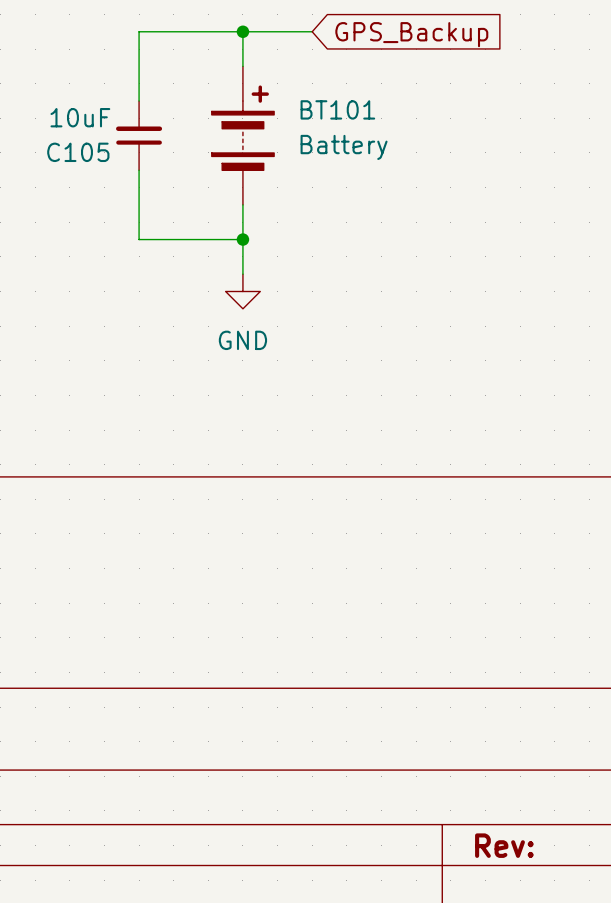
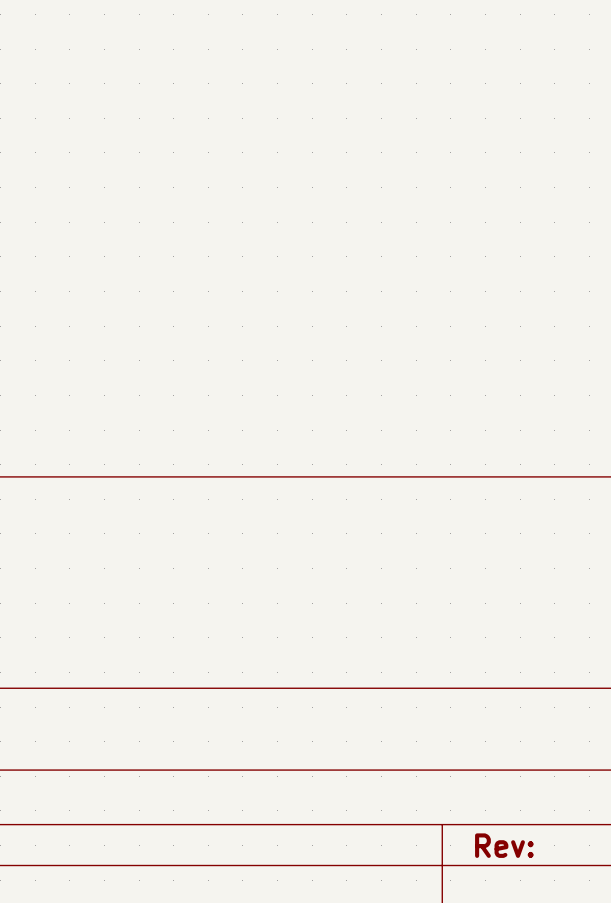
wire: (242, 31) (242, 66) -> none
junction: (242, 31) -> none
wire: (312, 31) (139, 31) (139, 101) -> none
global label: GPS_Backup (411, 34) -> none
C105: 10uF (139, 135) -> none
BT101: Battery (242, 135) -> none
wire: (139, 170) (139, 239) (242, 239) -> none
wire: (242, 204) (242, 274) -> none
junction: (242, 239) -> none
power symbol: GND (242, 291) -> none

